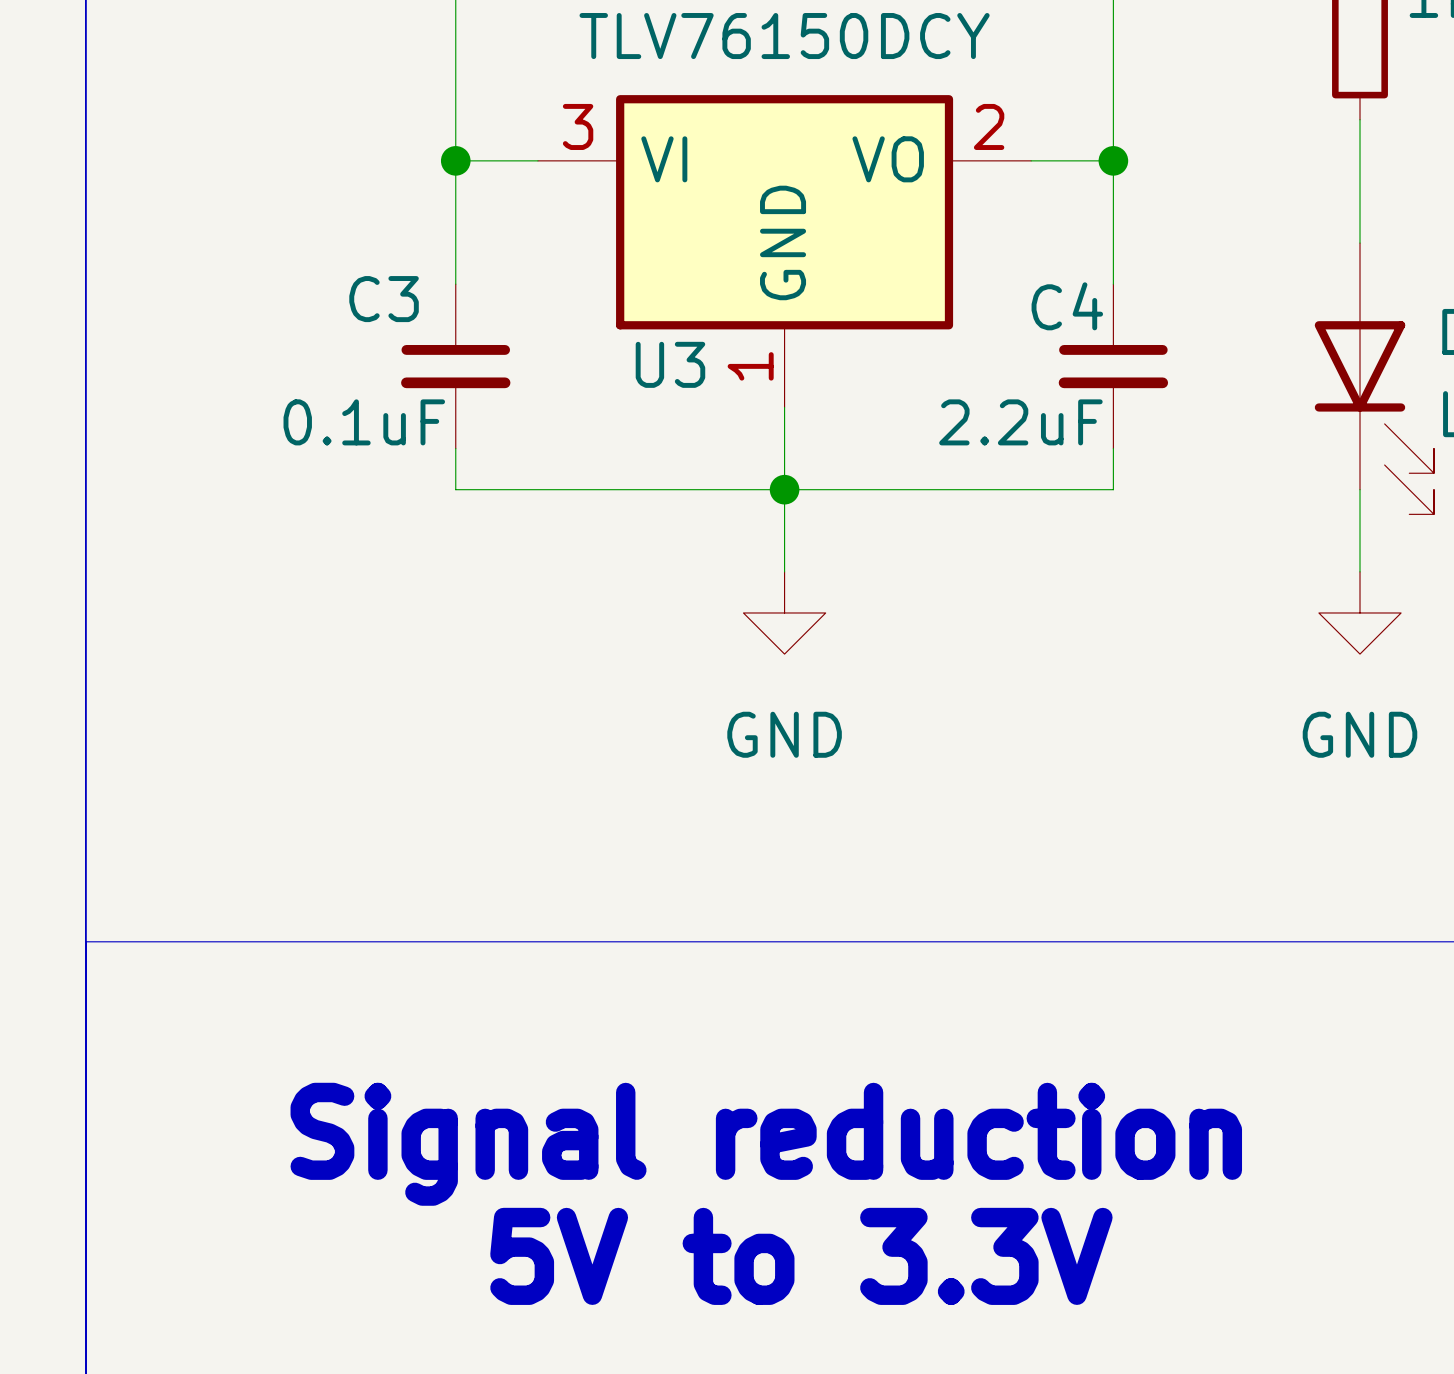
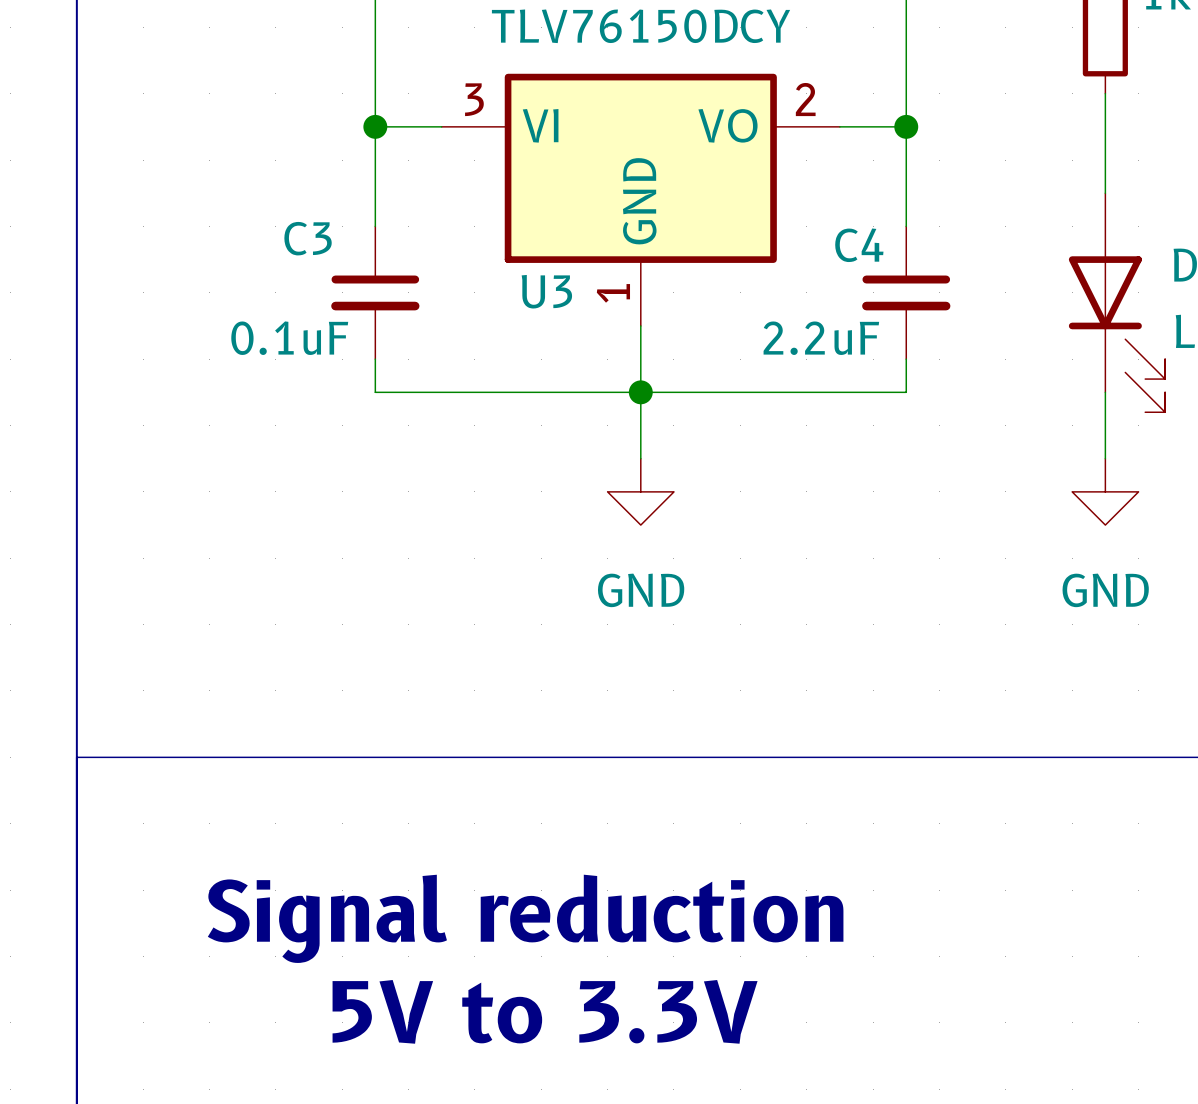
text position: Signal reduction (766, 1144) -> Signal reduction (525, 918)
text position: 5V to 3.3V (801, 1256) -> 5V to 3.3V (545, 1011)

